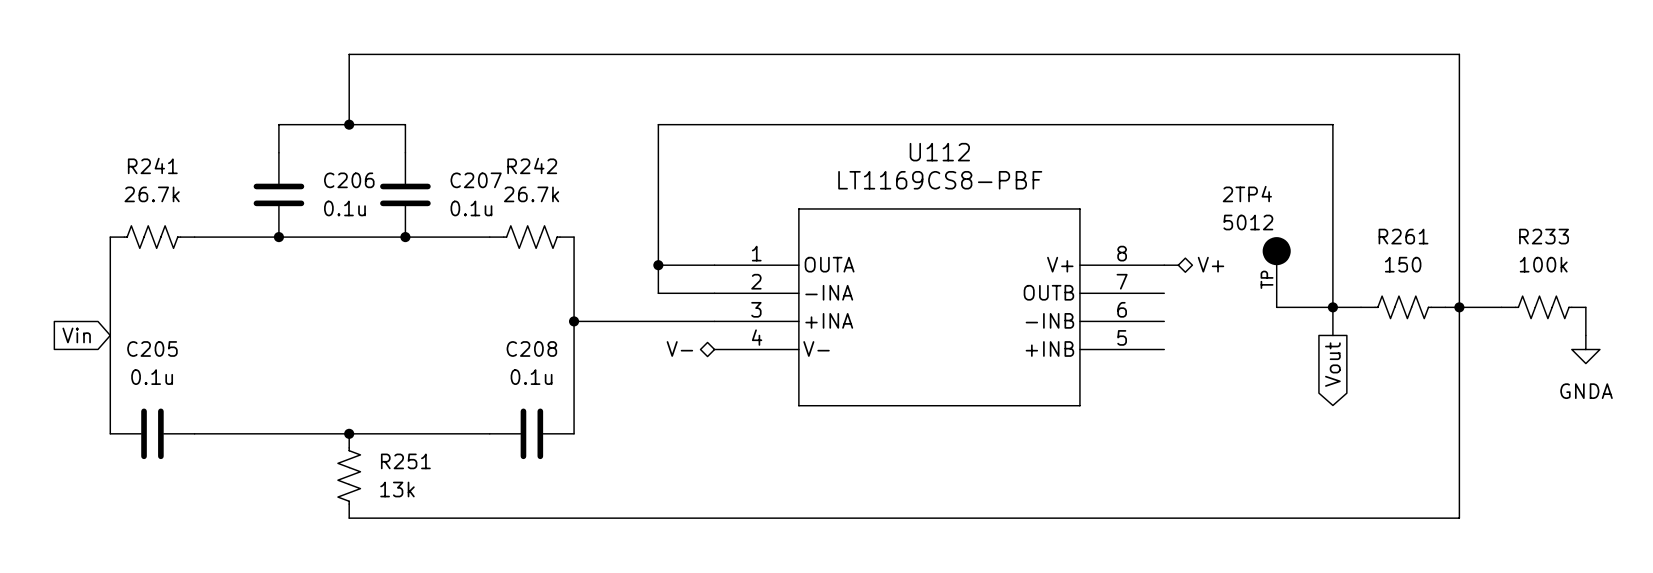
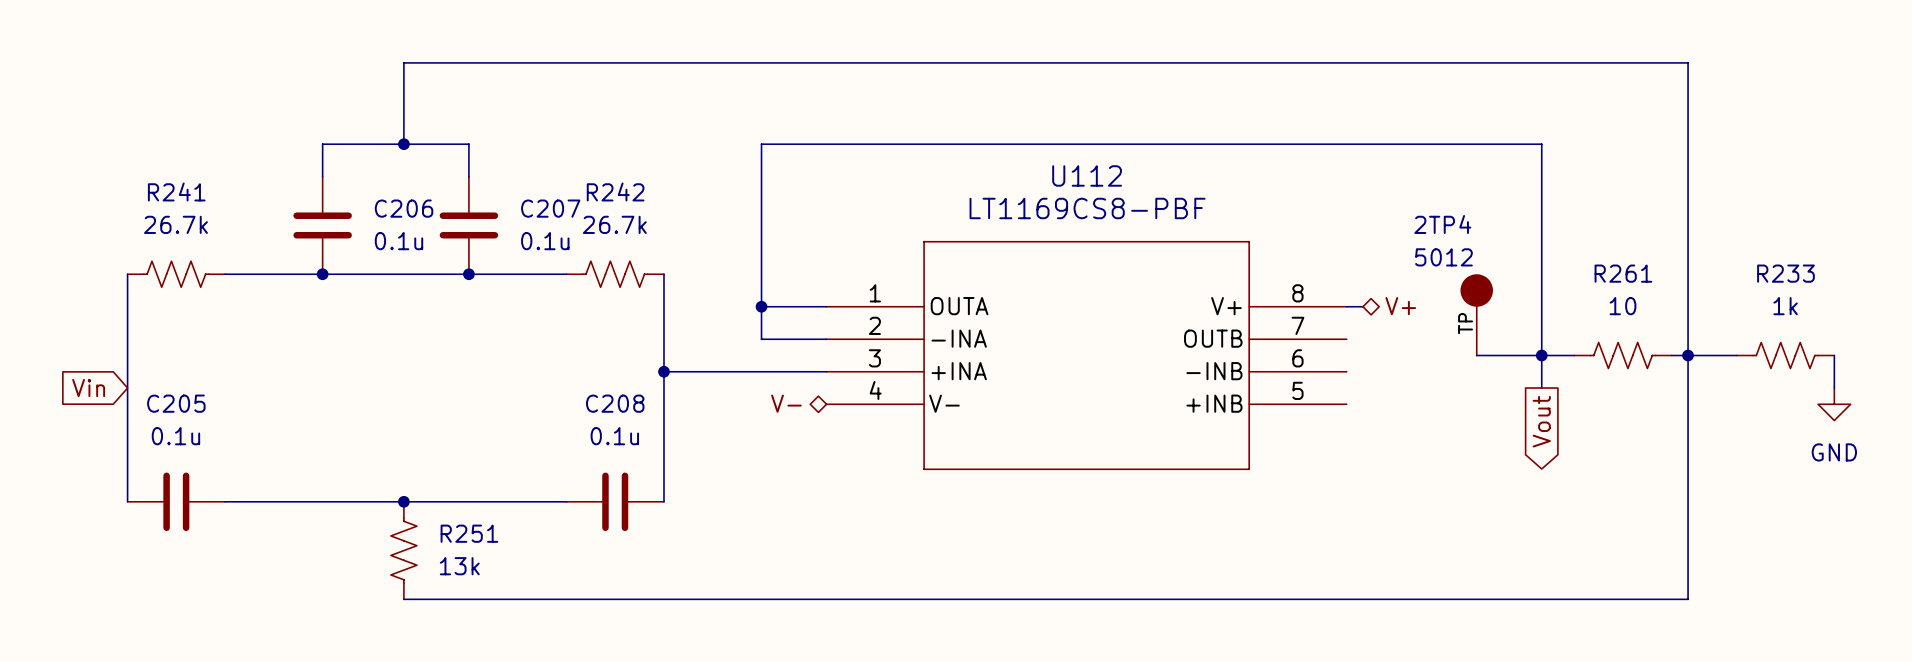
R261 value: 150 (1403, 264) -> 10 (1623, 306)
R233 value: 100k (1543, 264) -> 1k (1785, 306)
power symbol: GNDA (1585, 349) -> GND (1834, 404)

